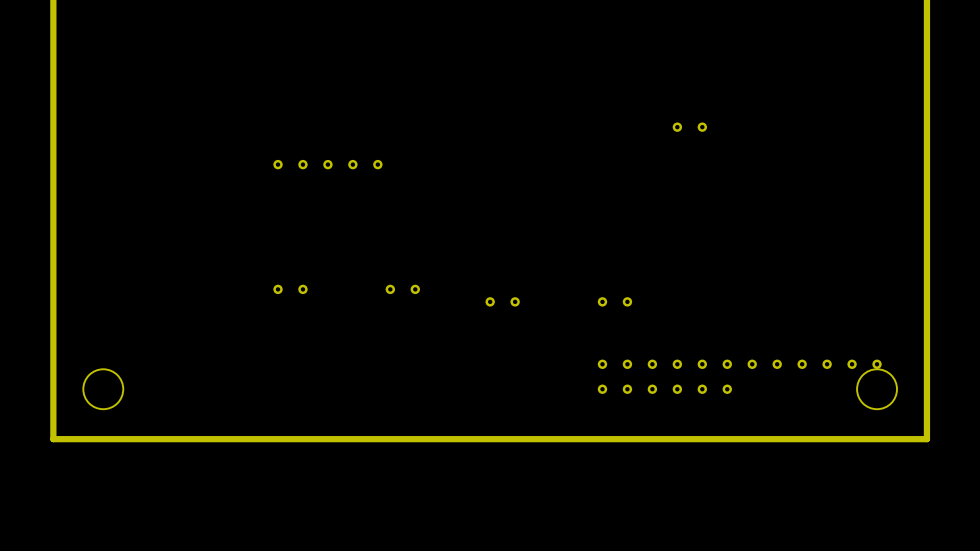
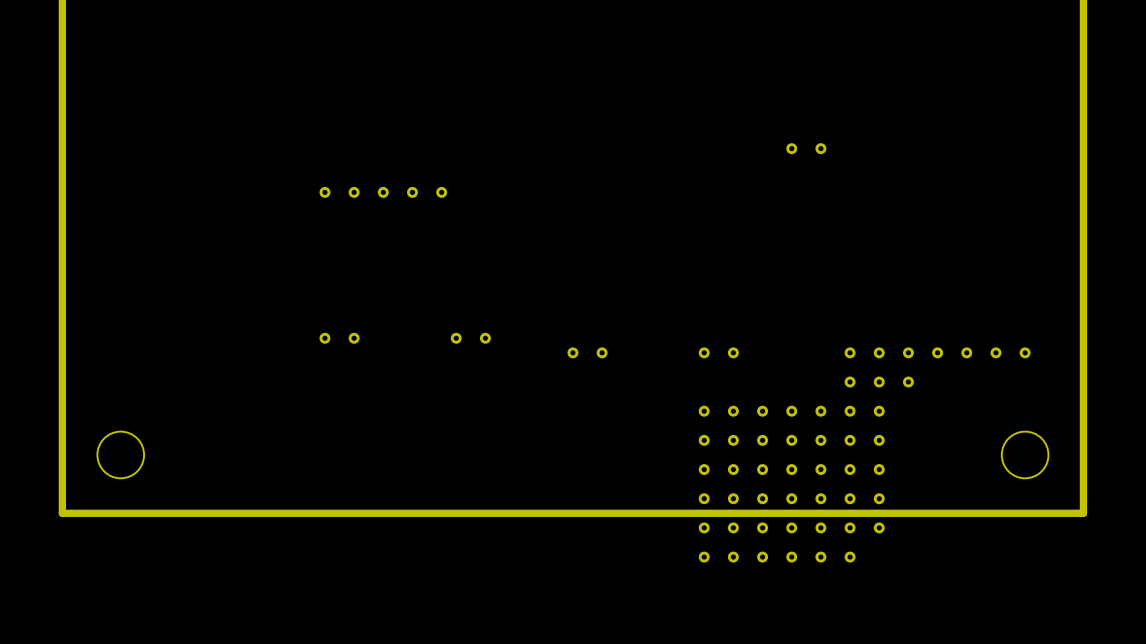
part: none -> (937, 367)
part: (827, 364) -> none
part: (677, 376) -> none
part: none -> (791, 484)

